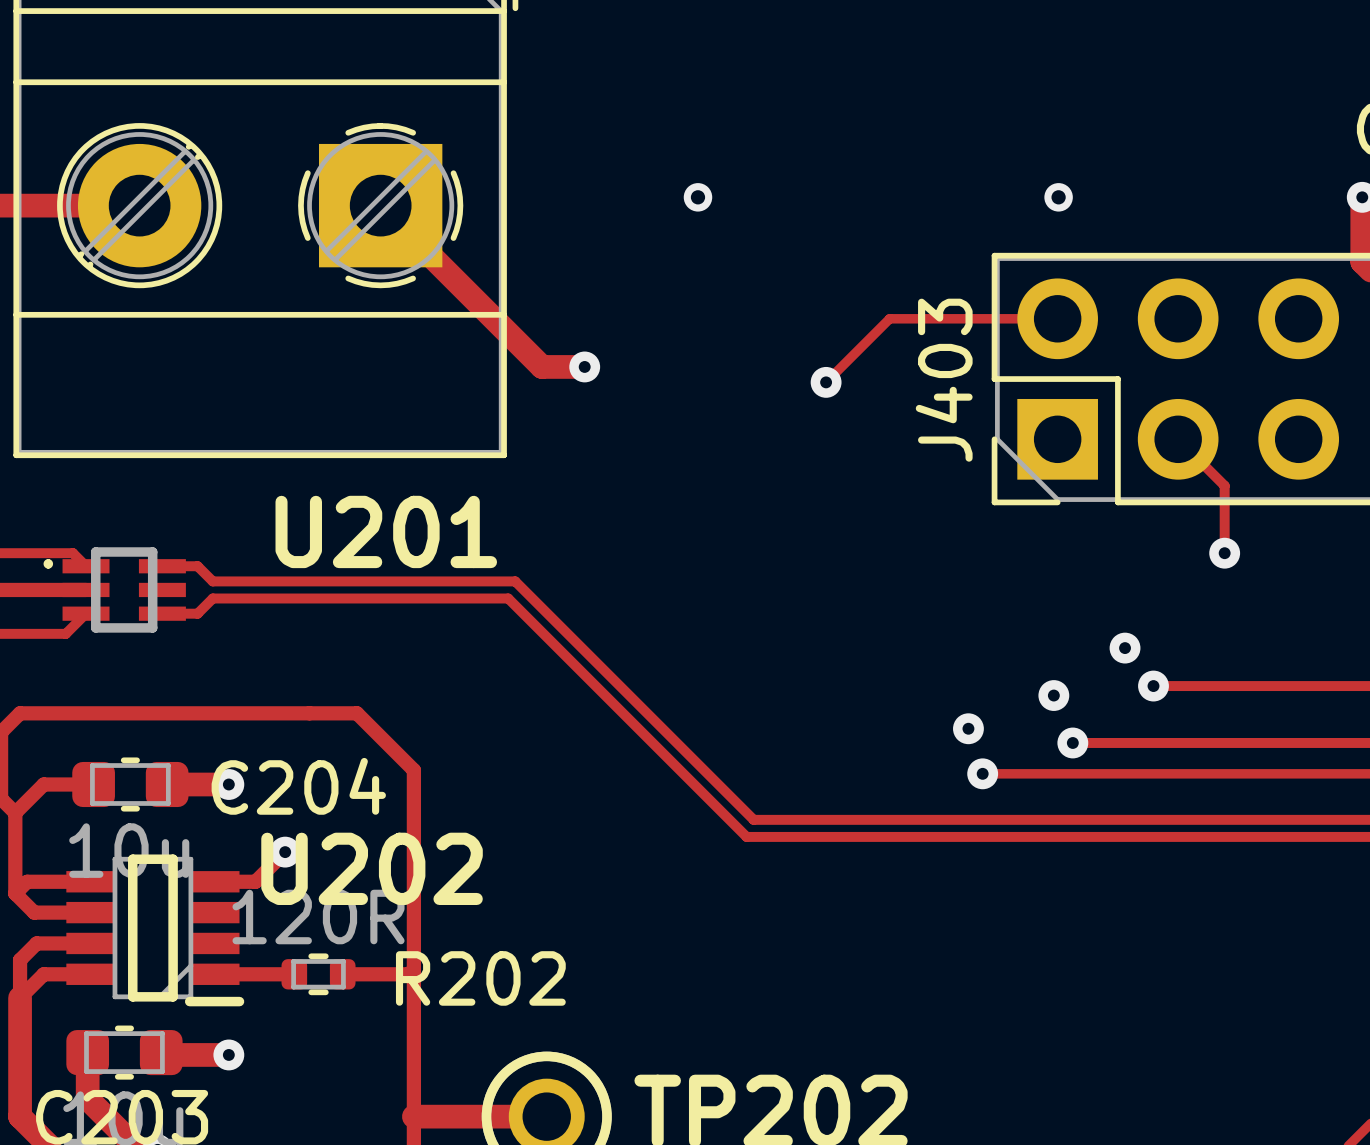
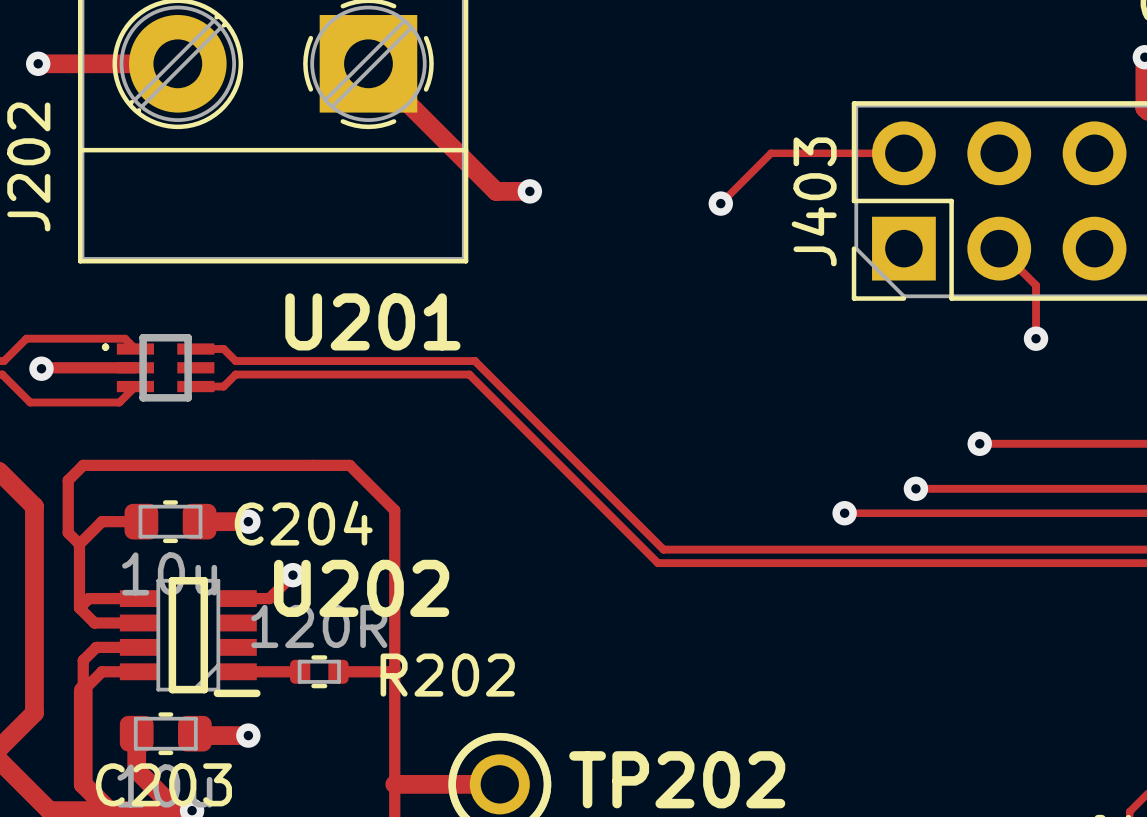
via: (697, 197) -> none
via: (1058, 197) -> none
via: (1125, 648) -> none
via: (1053, 695) -> none
via: (968, 728) -> none

